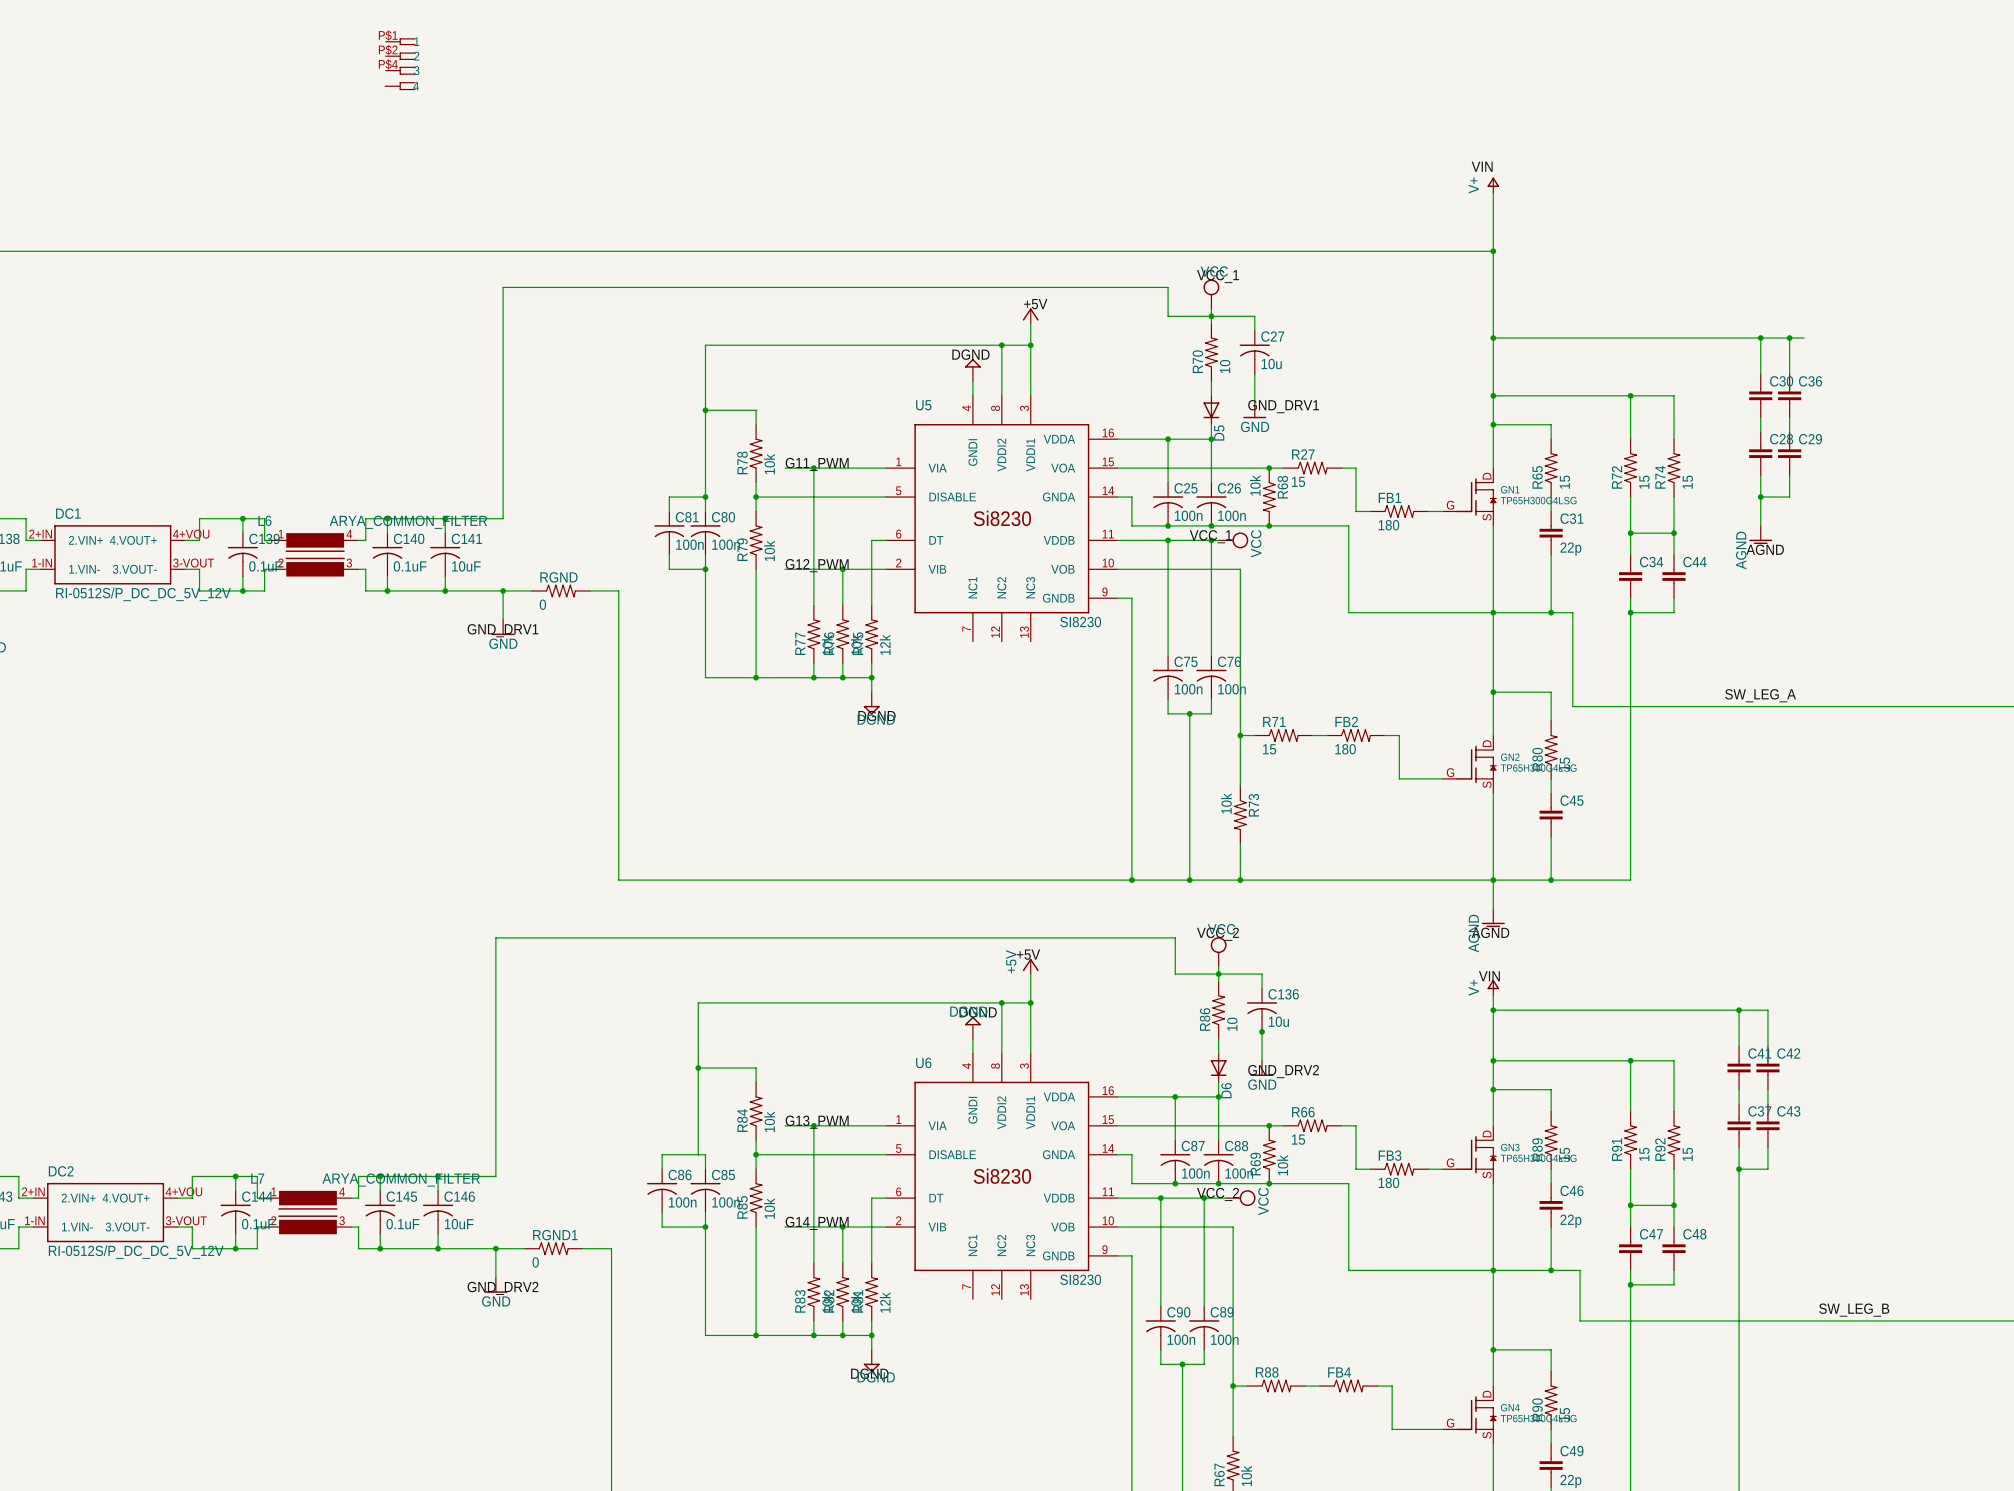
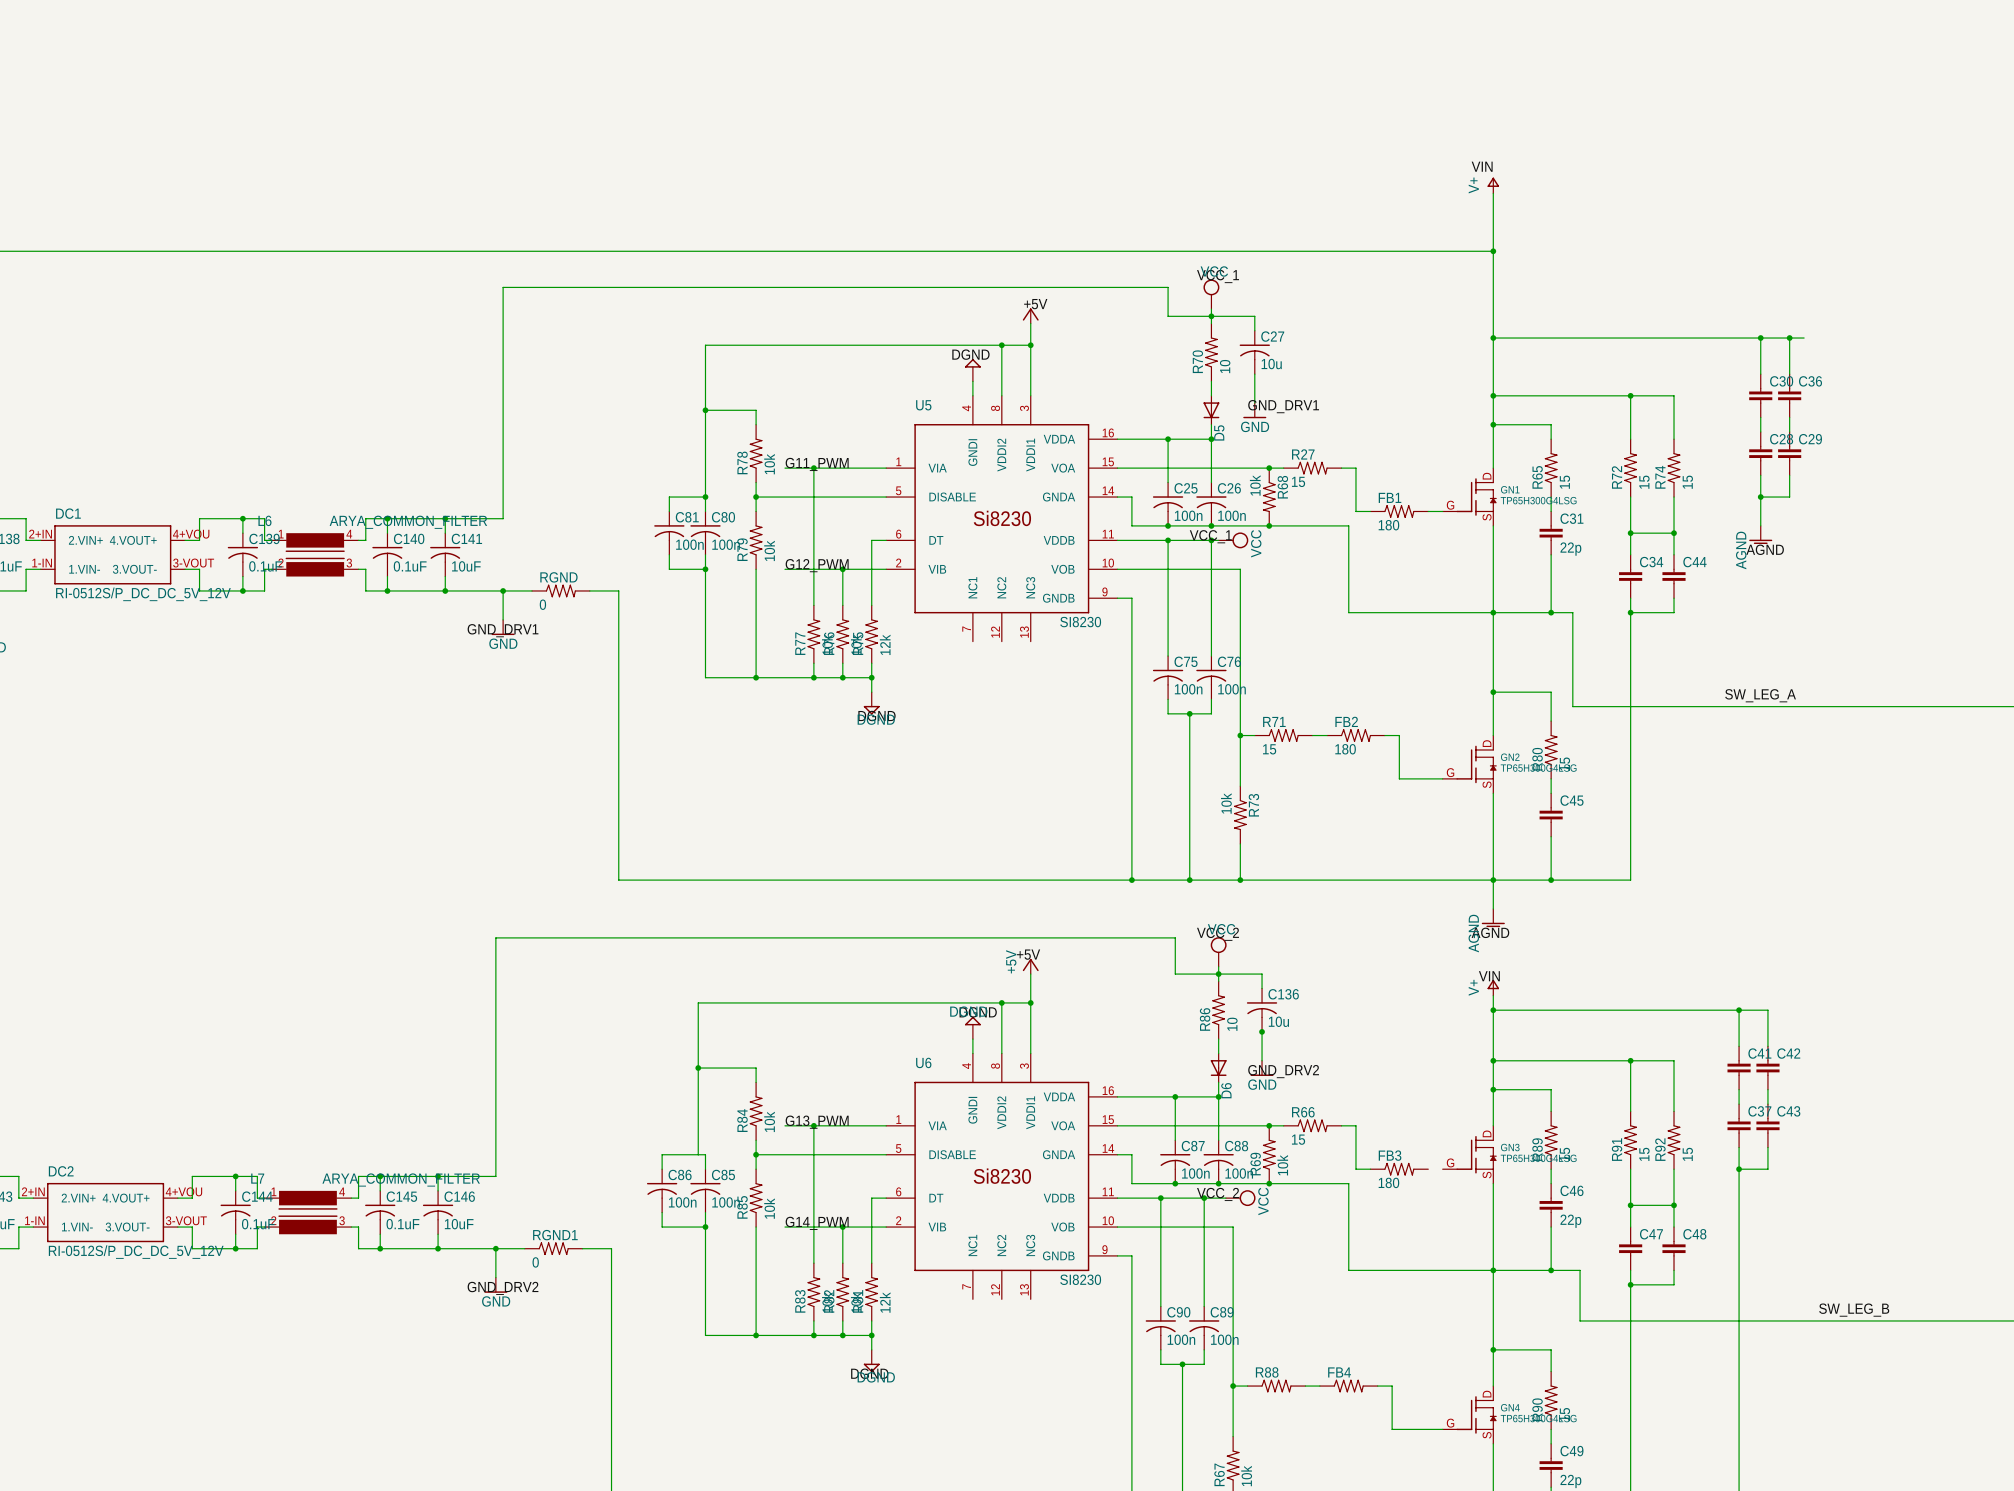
part: (400, 64) -> none
wire: (1428, 1169) (1442, 1169) -> none

